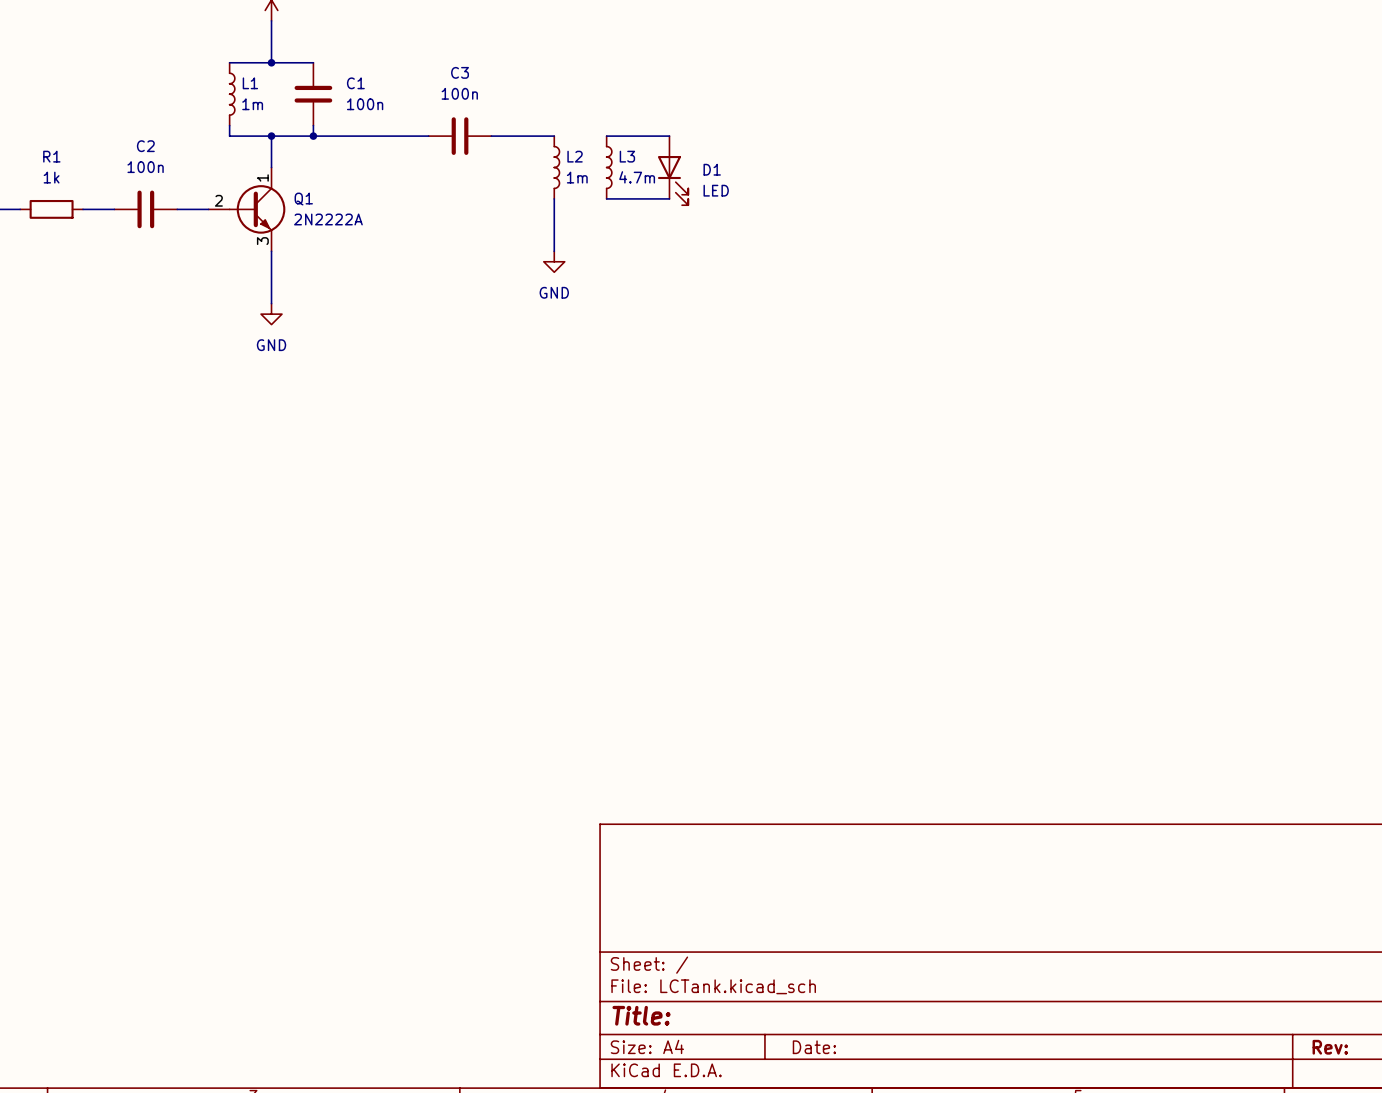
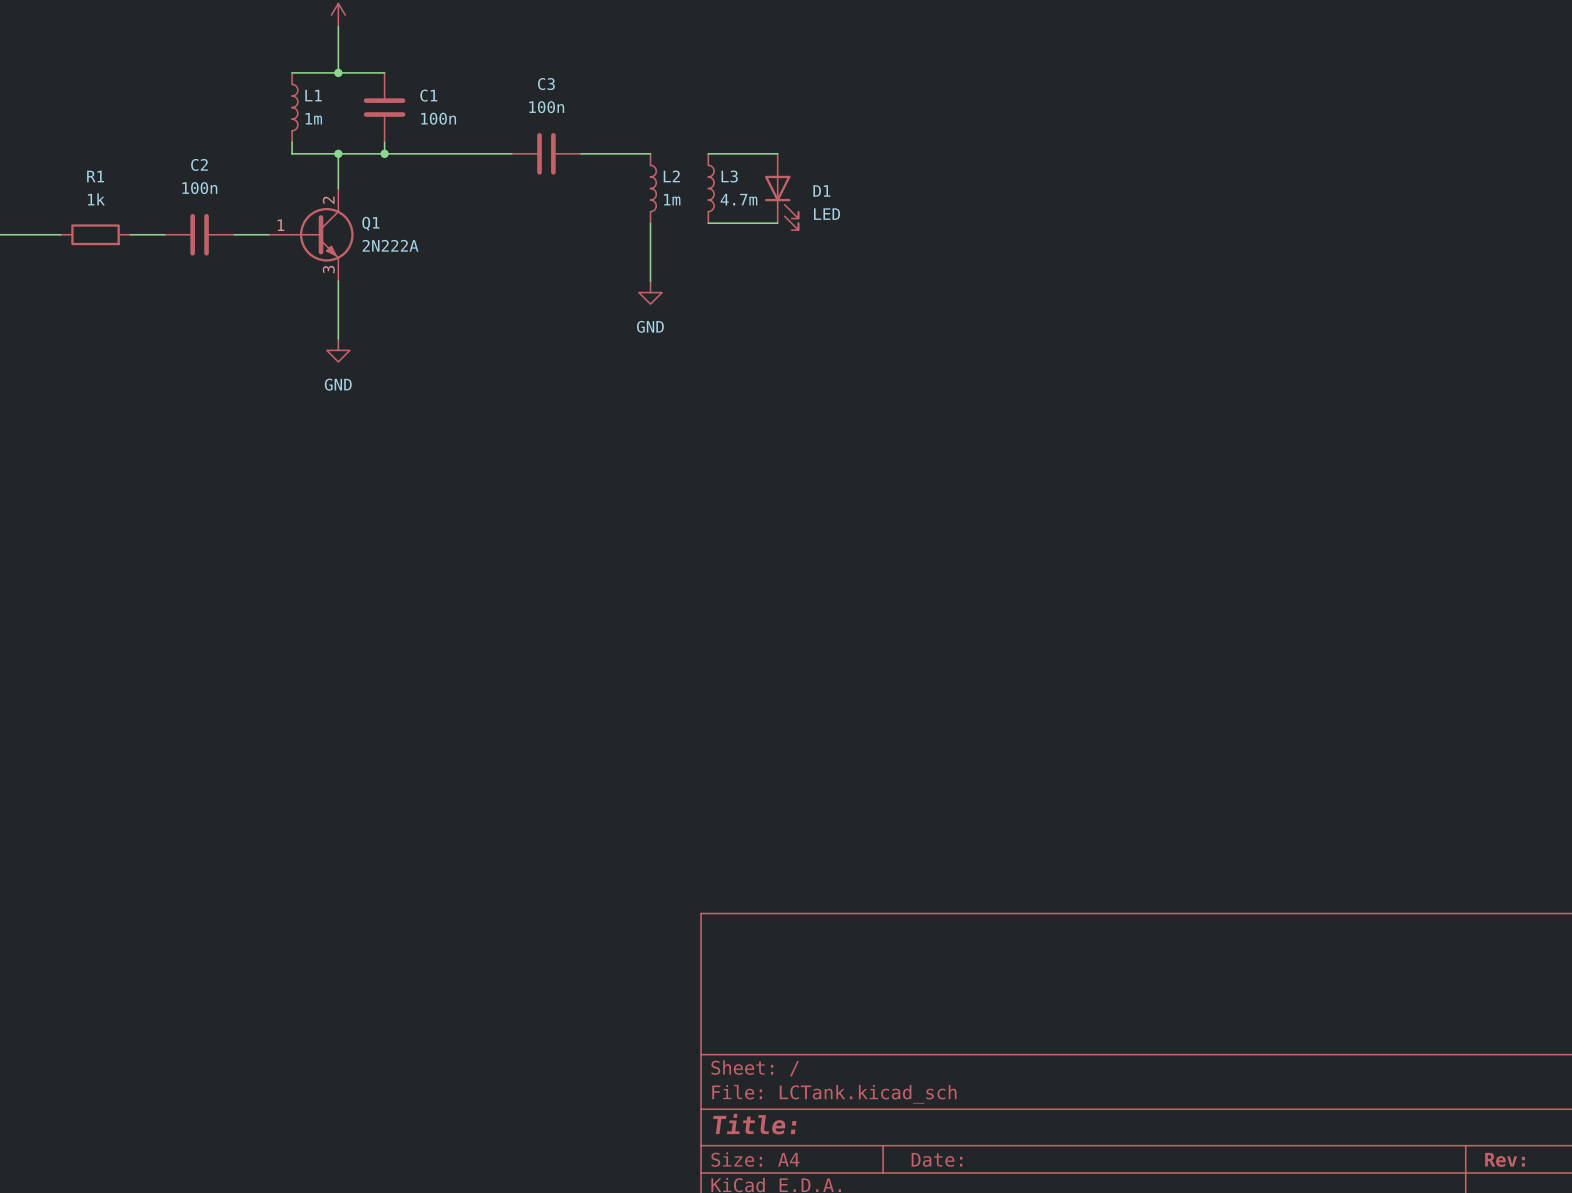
Q1 pin number: 1 (262, 177) -> 2 (328, 200)
Q1 pin number: 2 (218, 200) -> 1 (280, 225)
Q1 value: 2N2222A (328, 219) -> 2N222A (390, 245)

